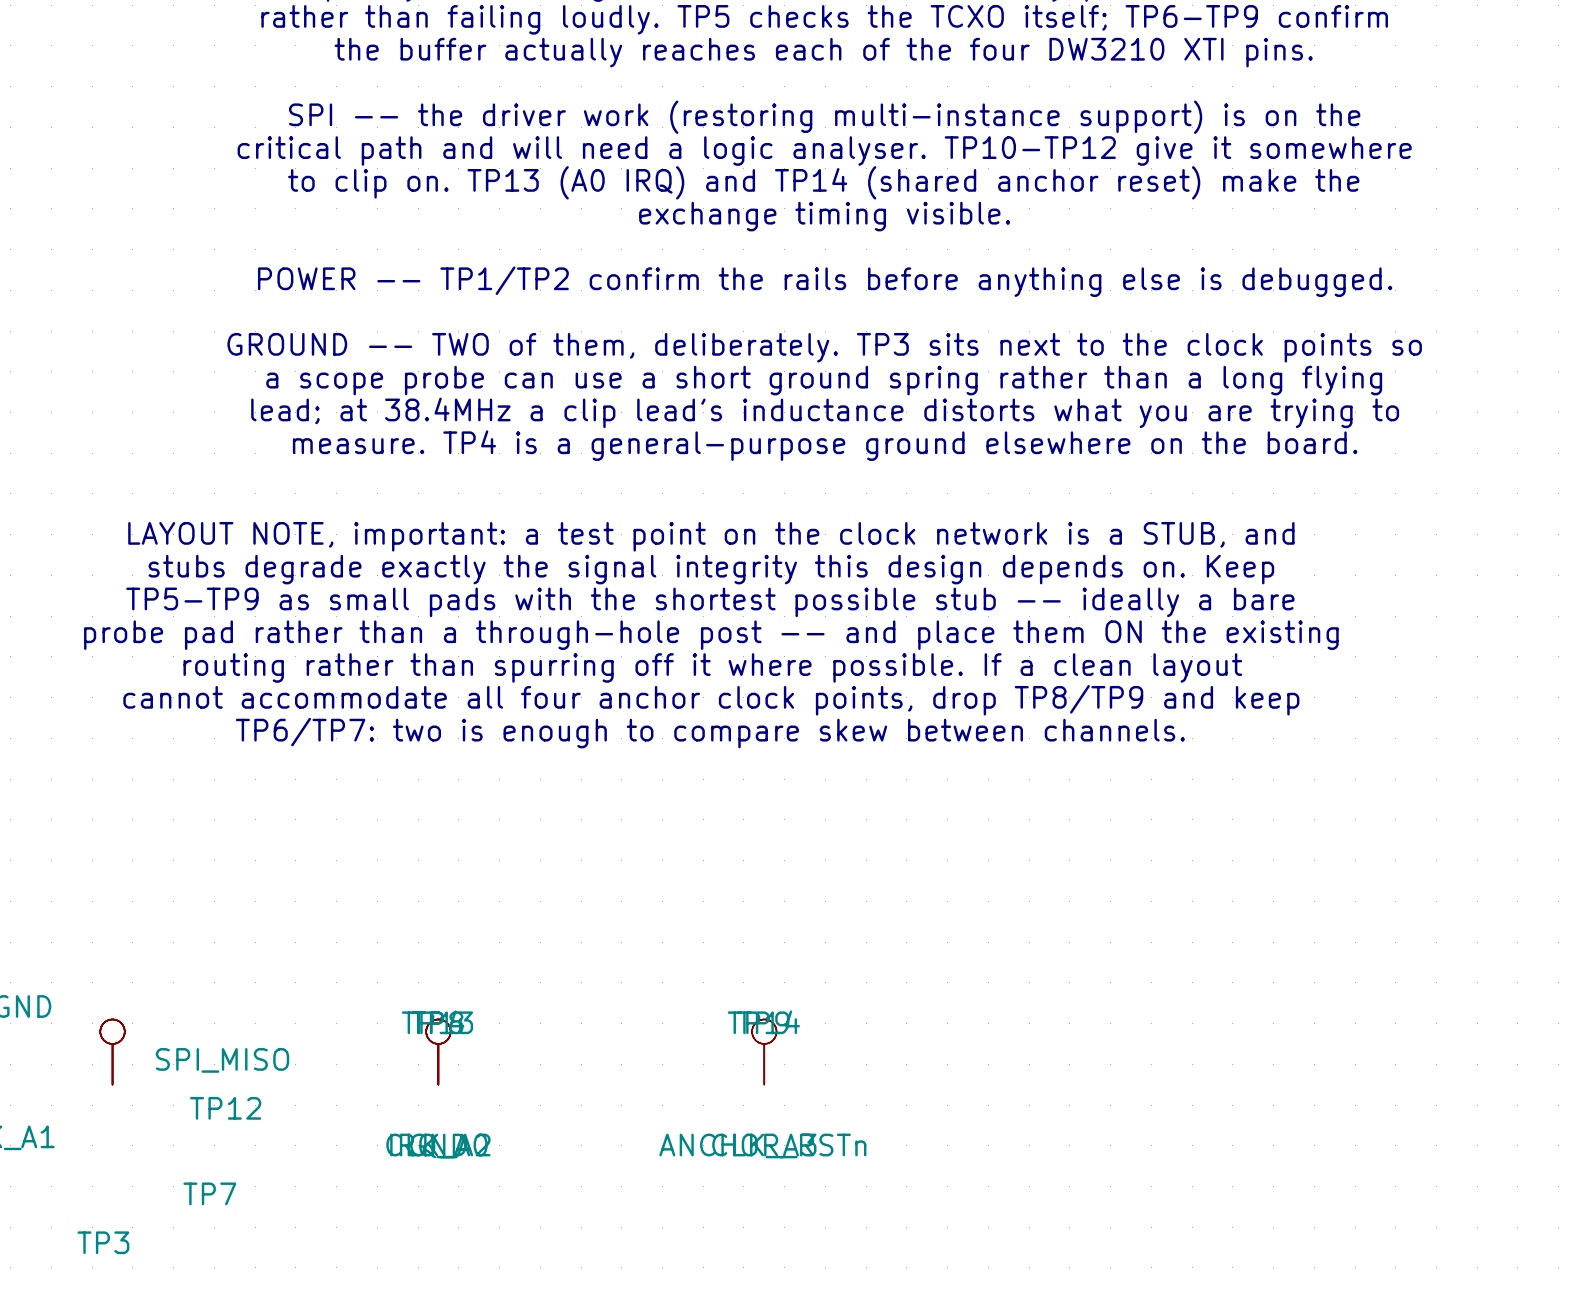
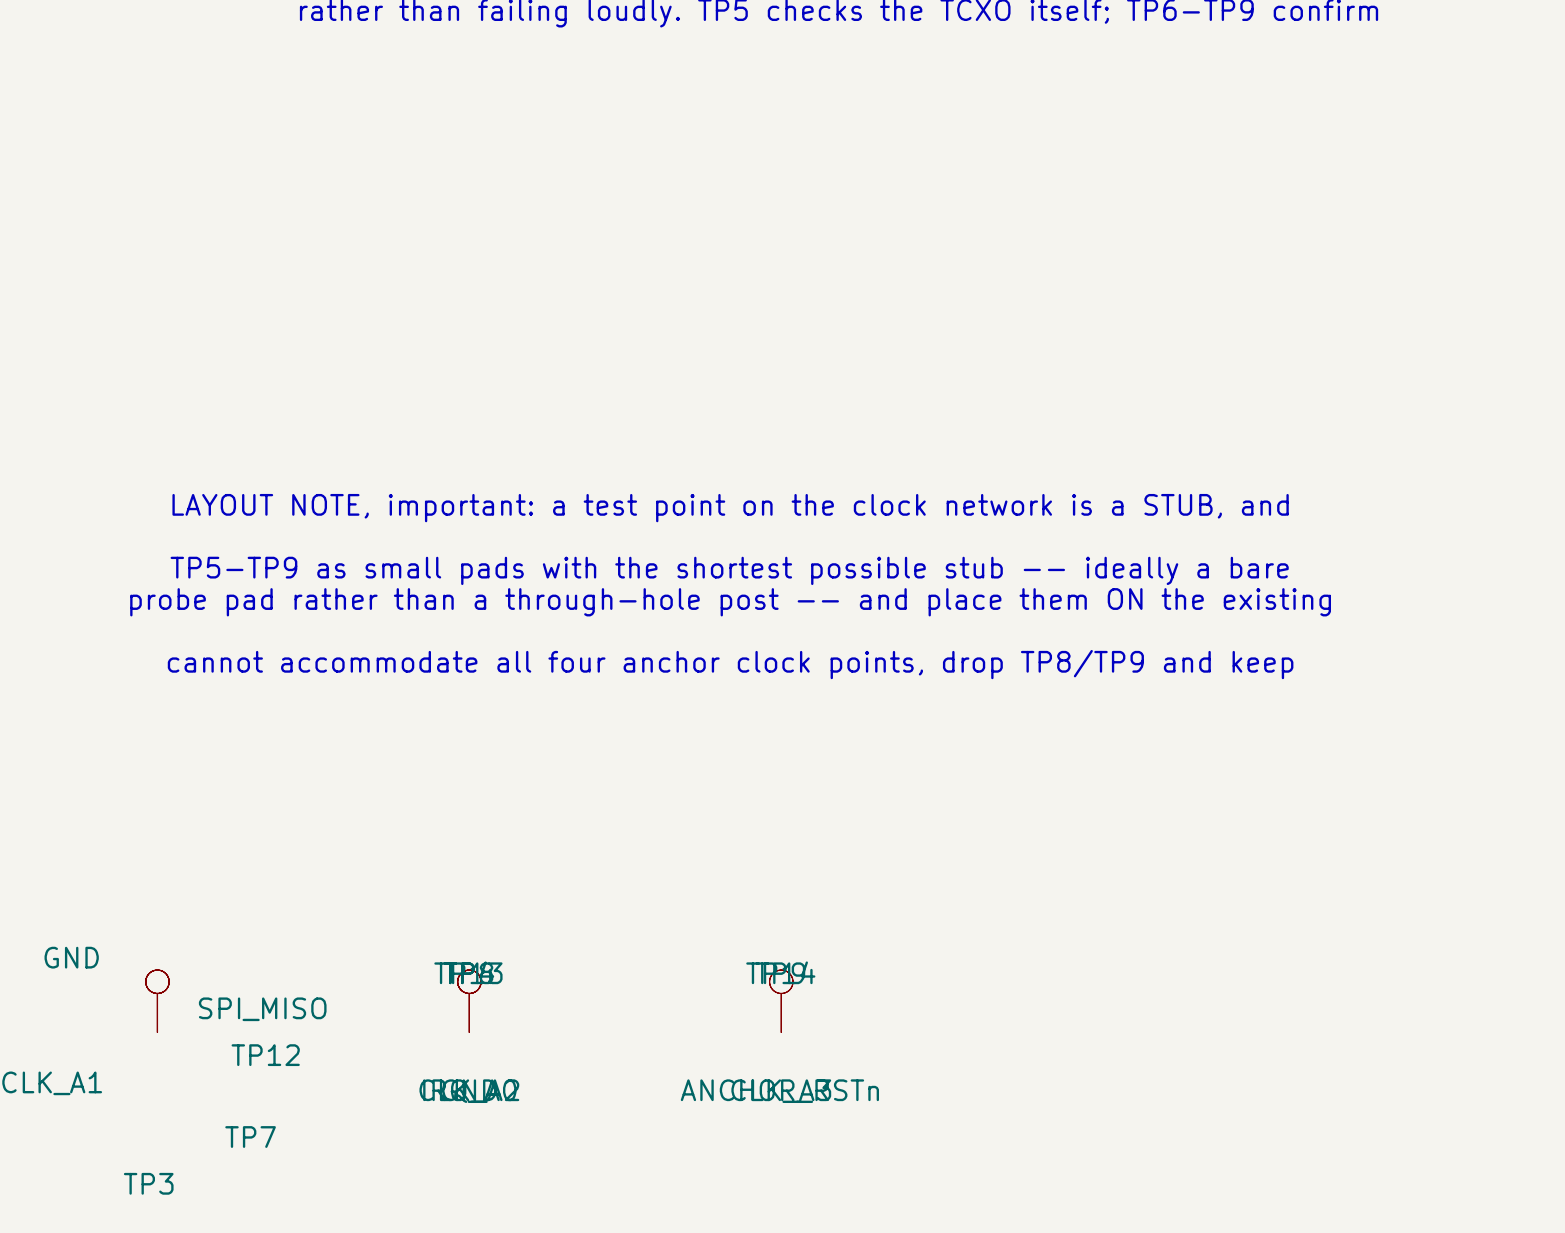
text: the buffer actually reaches each of the four DW3210 XTI pins. (823, 52) -> none
text: SPI -- the driver work (restoring multi-instance support) is on the (824, 117) -> none
text: critical path and will need a logic analyser. TP10-TP12 give it somewhere (824, 151) -> none
text: to clip on. TP13 (A0 IRQ) and TP14 (shared anchor reset) make the (823, 182) -> none
text: exchange timing visible. (824, 216) -> none
text: POWER -- TP1/TP2 confirm the rails before anything else is debugged. (825, 281) -> none
text: GROUND -- TWO of them, deliberately. TP3 sits next to the clock points so (824, 347) -> none
text: a scope probe can use a short ground spring rather than a long flying (824, 380) -> none
text: lead; at 38.4MHz a clip lead's inductance distorts what you are trying to (825, 412) -> none
text: measure. TP4 is a general-purpose ground elsewhere on the board. (825, 445) -> none
text: stubs degrade exactly the signal integrity this design depends on. Keep (711, 569) -> none
text: routing rather than spurring off it where possible. If a clean layout (712, 667) -> none
text: TP6/TP7: two is enough to compare skew between channels. (710, 733) -> none

